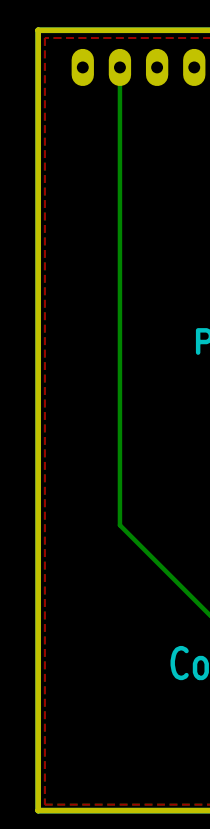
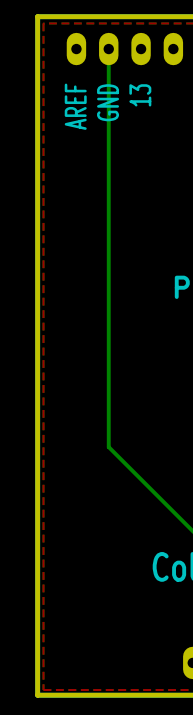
text: none -> 13 (140, 95)
text: none -> GND (108, 102)
text: none -> AREF (75, 106)

